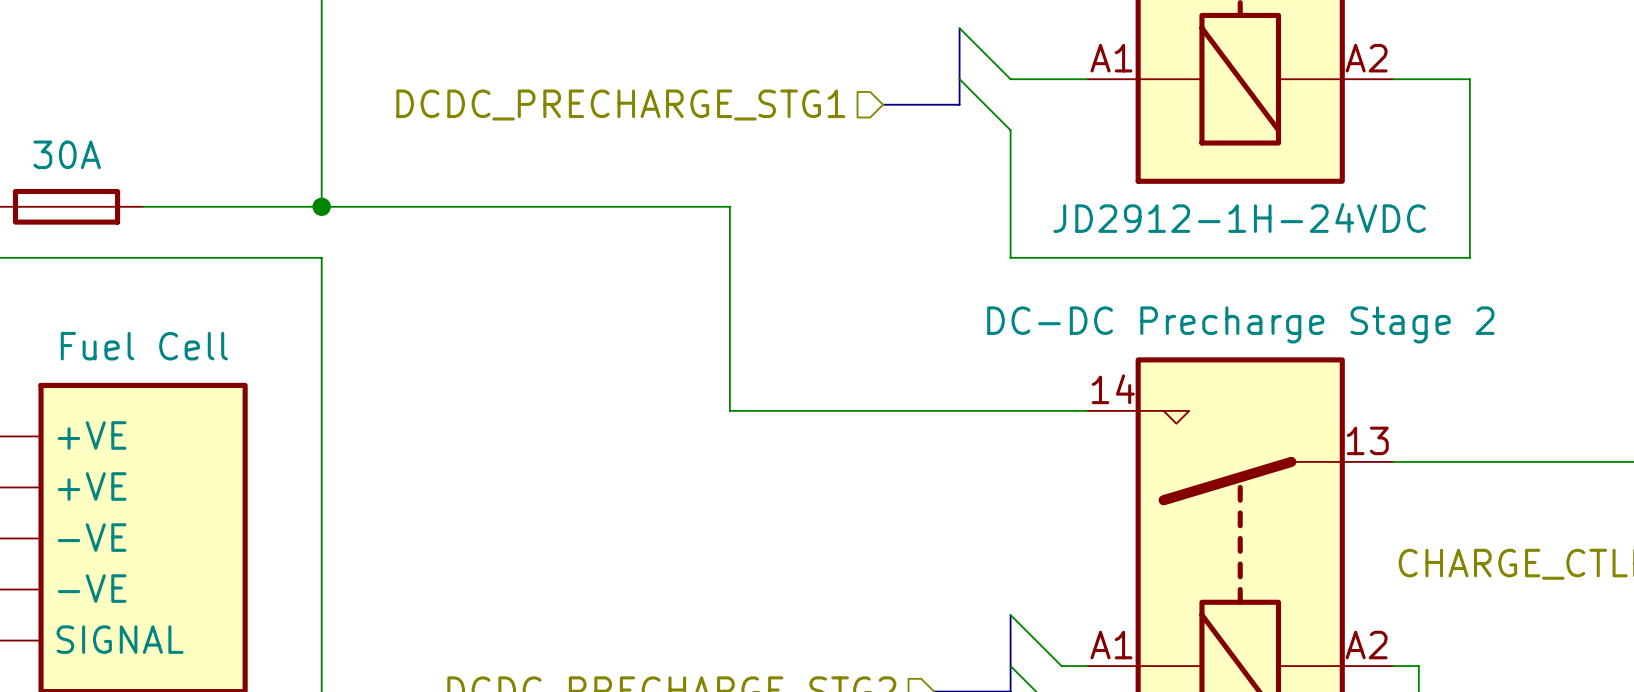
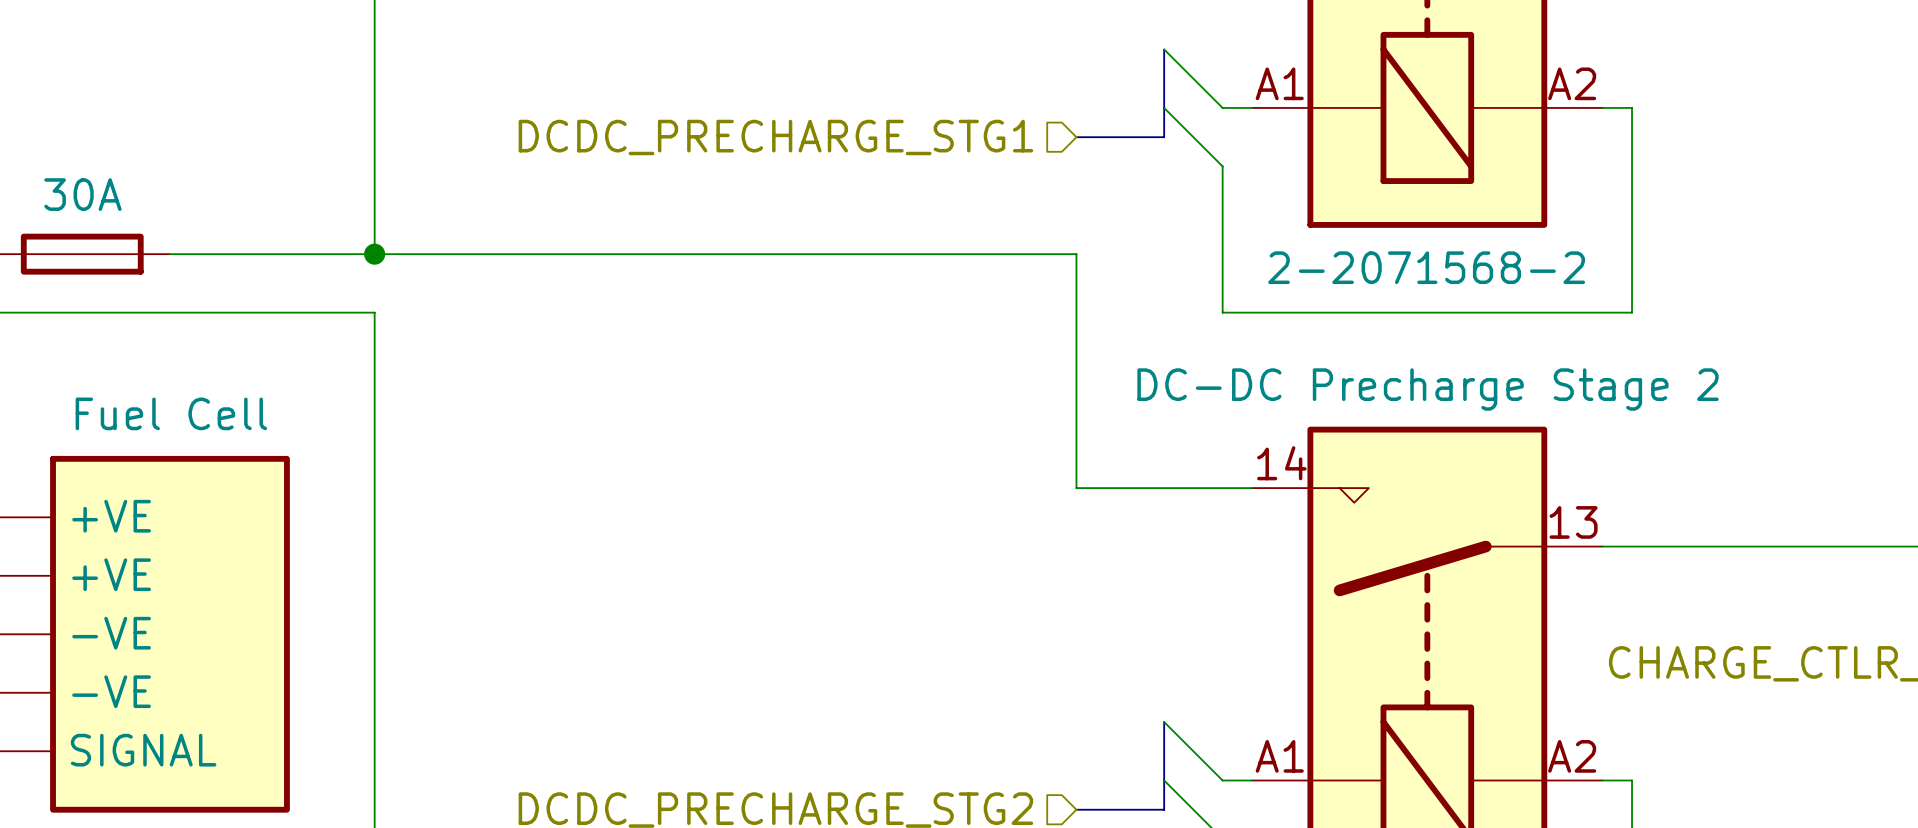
wire: (959, 28) (1010, 79) (1061, 79) -> (1164, 49) (1222, 107)
bus: (959, 28) (959, 104) -> (1164, 49) (1164, 137) (1105, 137)
wire: (959, 79) (1010, 130) (1010, 257) (1061, 257) -> (1164, 107) (1222, 166) (1222, 312)
wire: (1418, 79) (1469, 79) (1469, 257) (1418, 257) -> (1632, 107) (1632, 312)
bus: (883, 104) (934, 104) -> none
hierarchical label position: DCDC_PRECHARGE_STG1 (620, 105) -> DCDC_PRECHARGE_STG1 (775, 137)
wire: (729, 206) (729, 410) (934, 410) -> (842, 254) (1076, 254) (1076, 488)
part text: JD2912-1H-24VDC (1239, 217) -> 2-2071568-2 (1426, 267)

